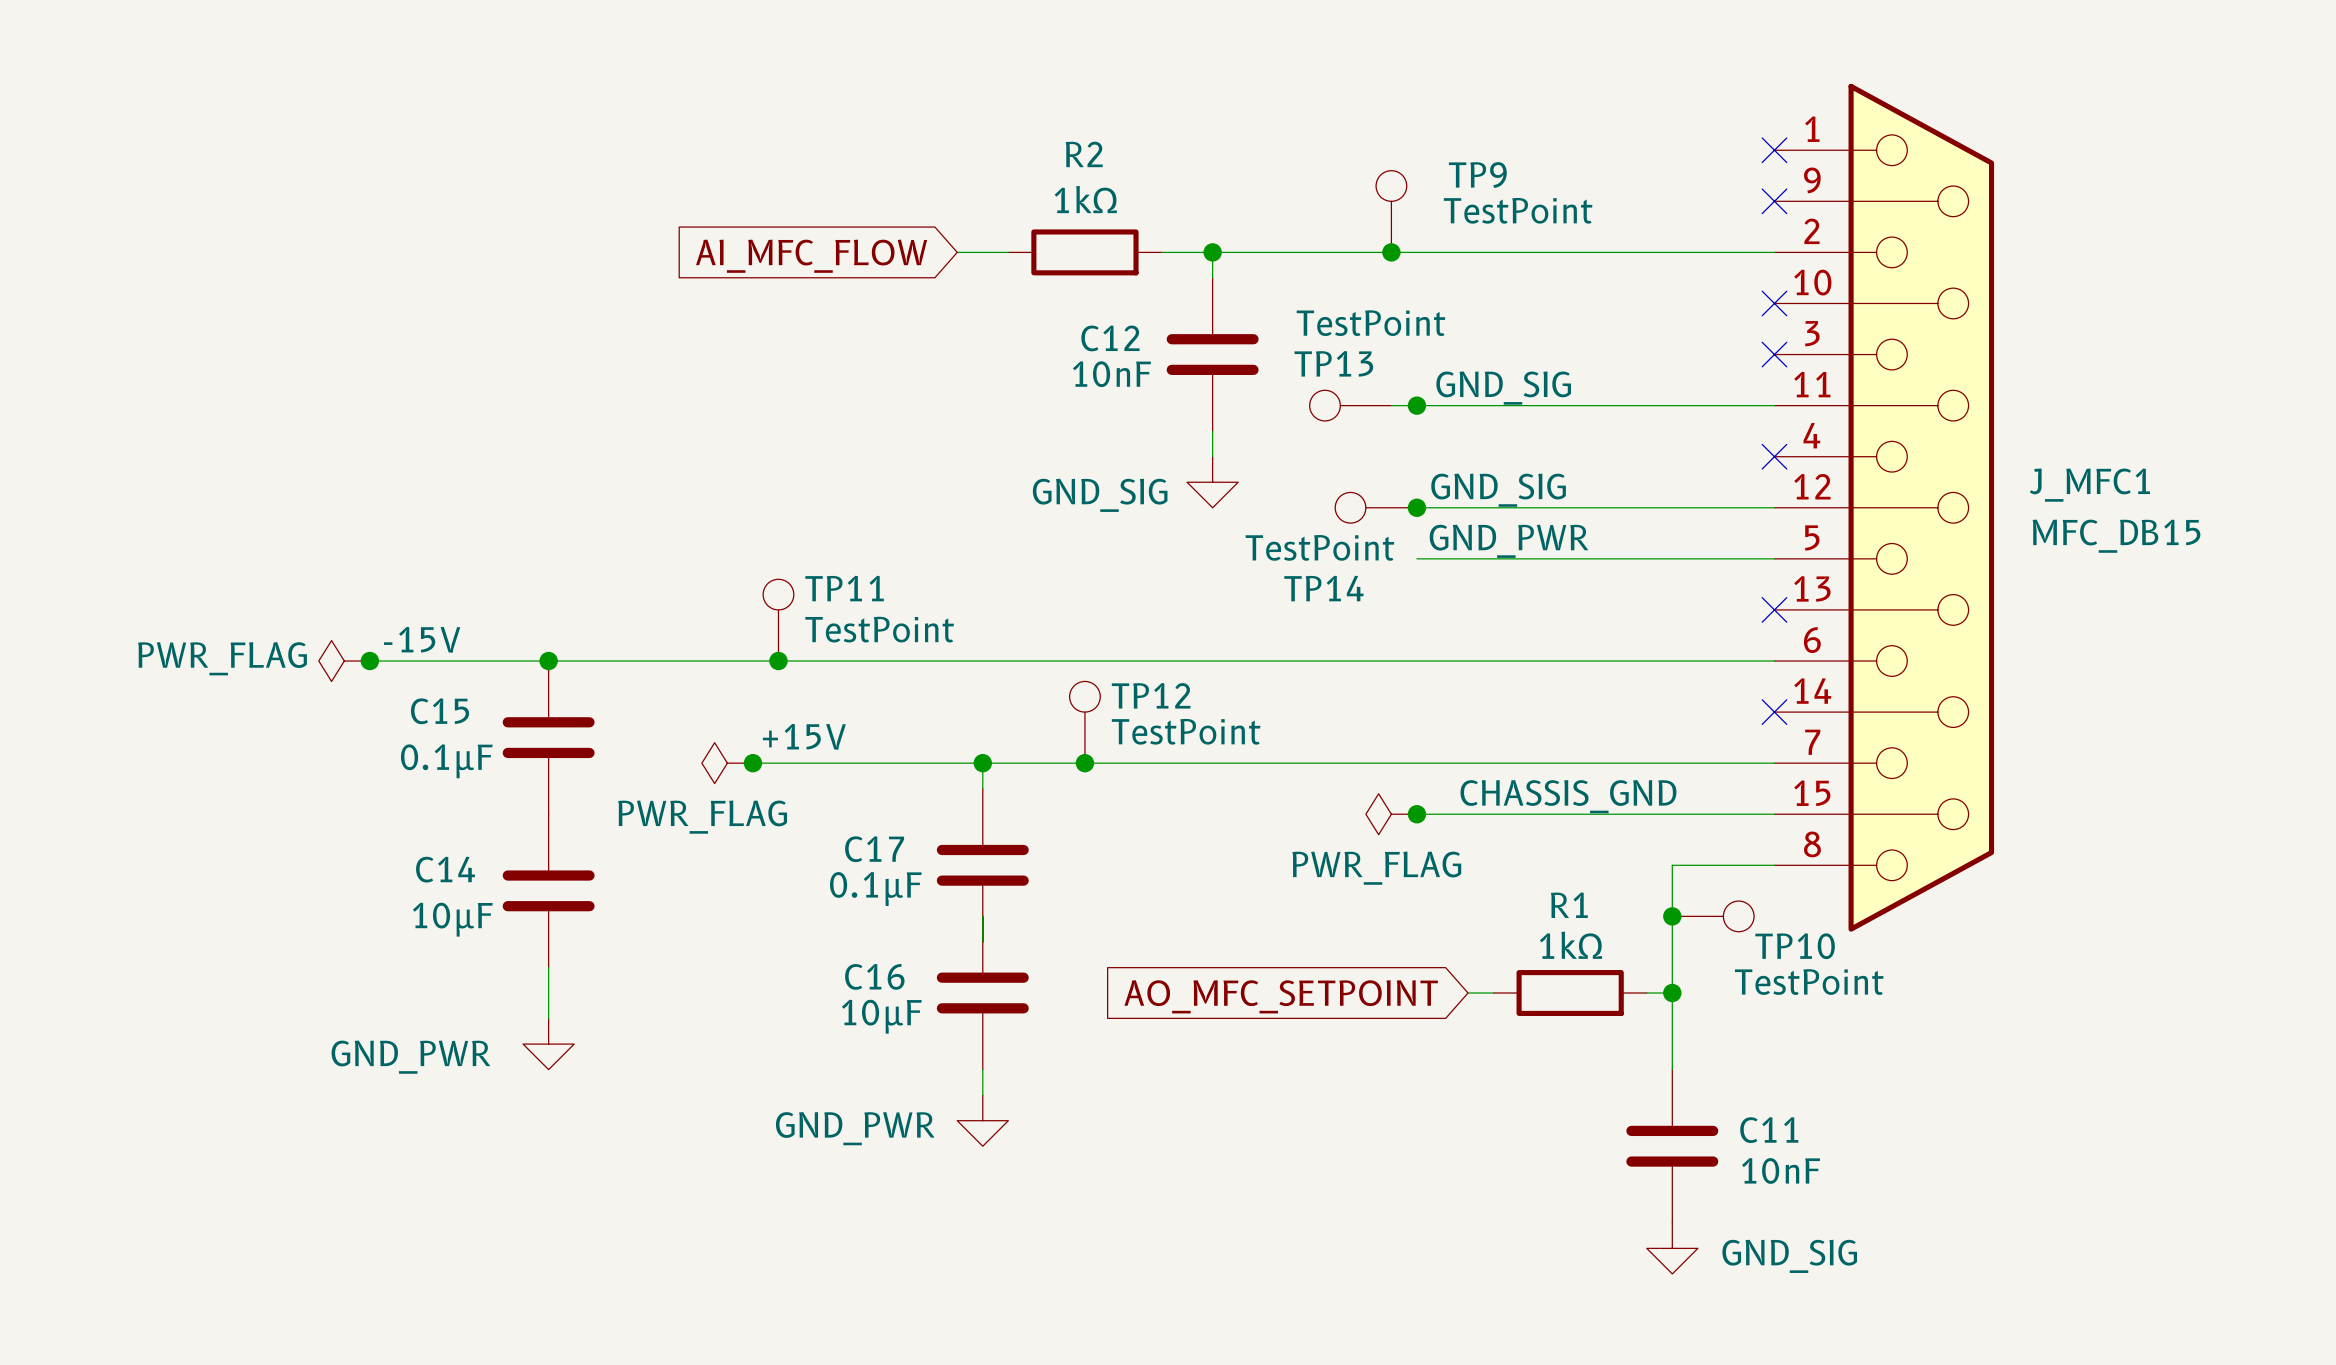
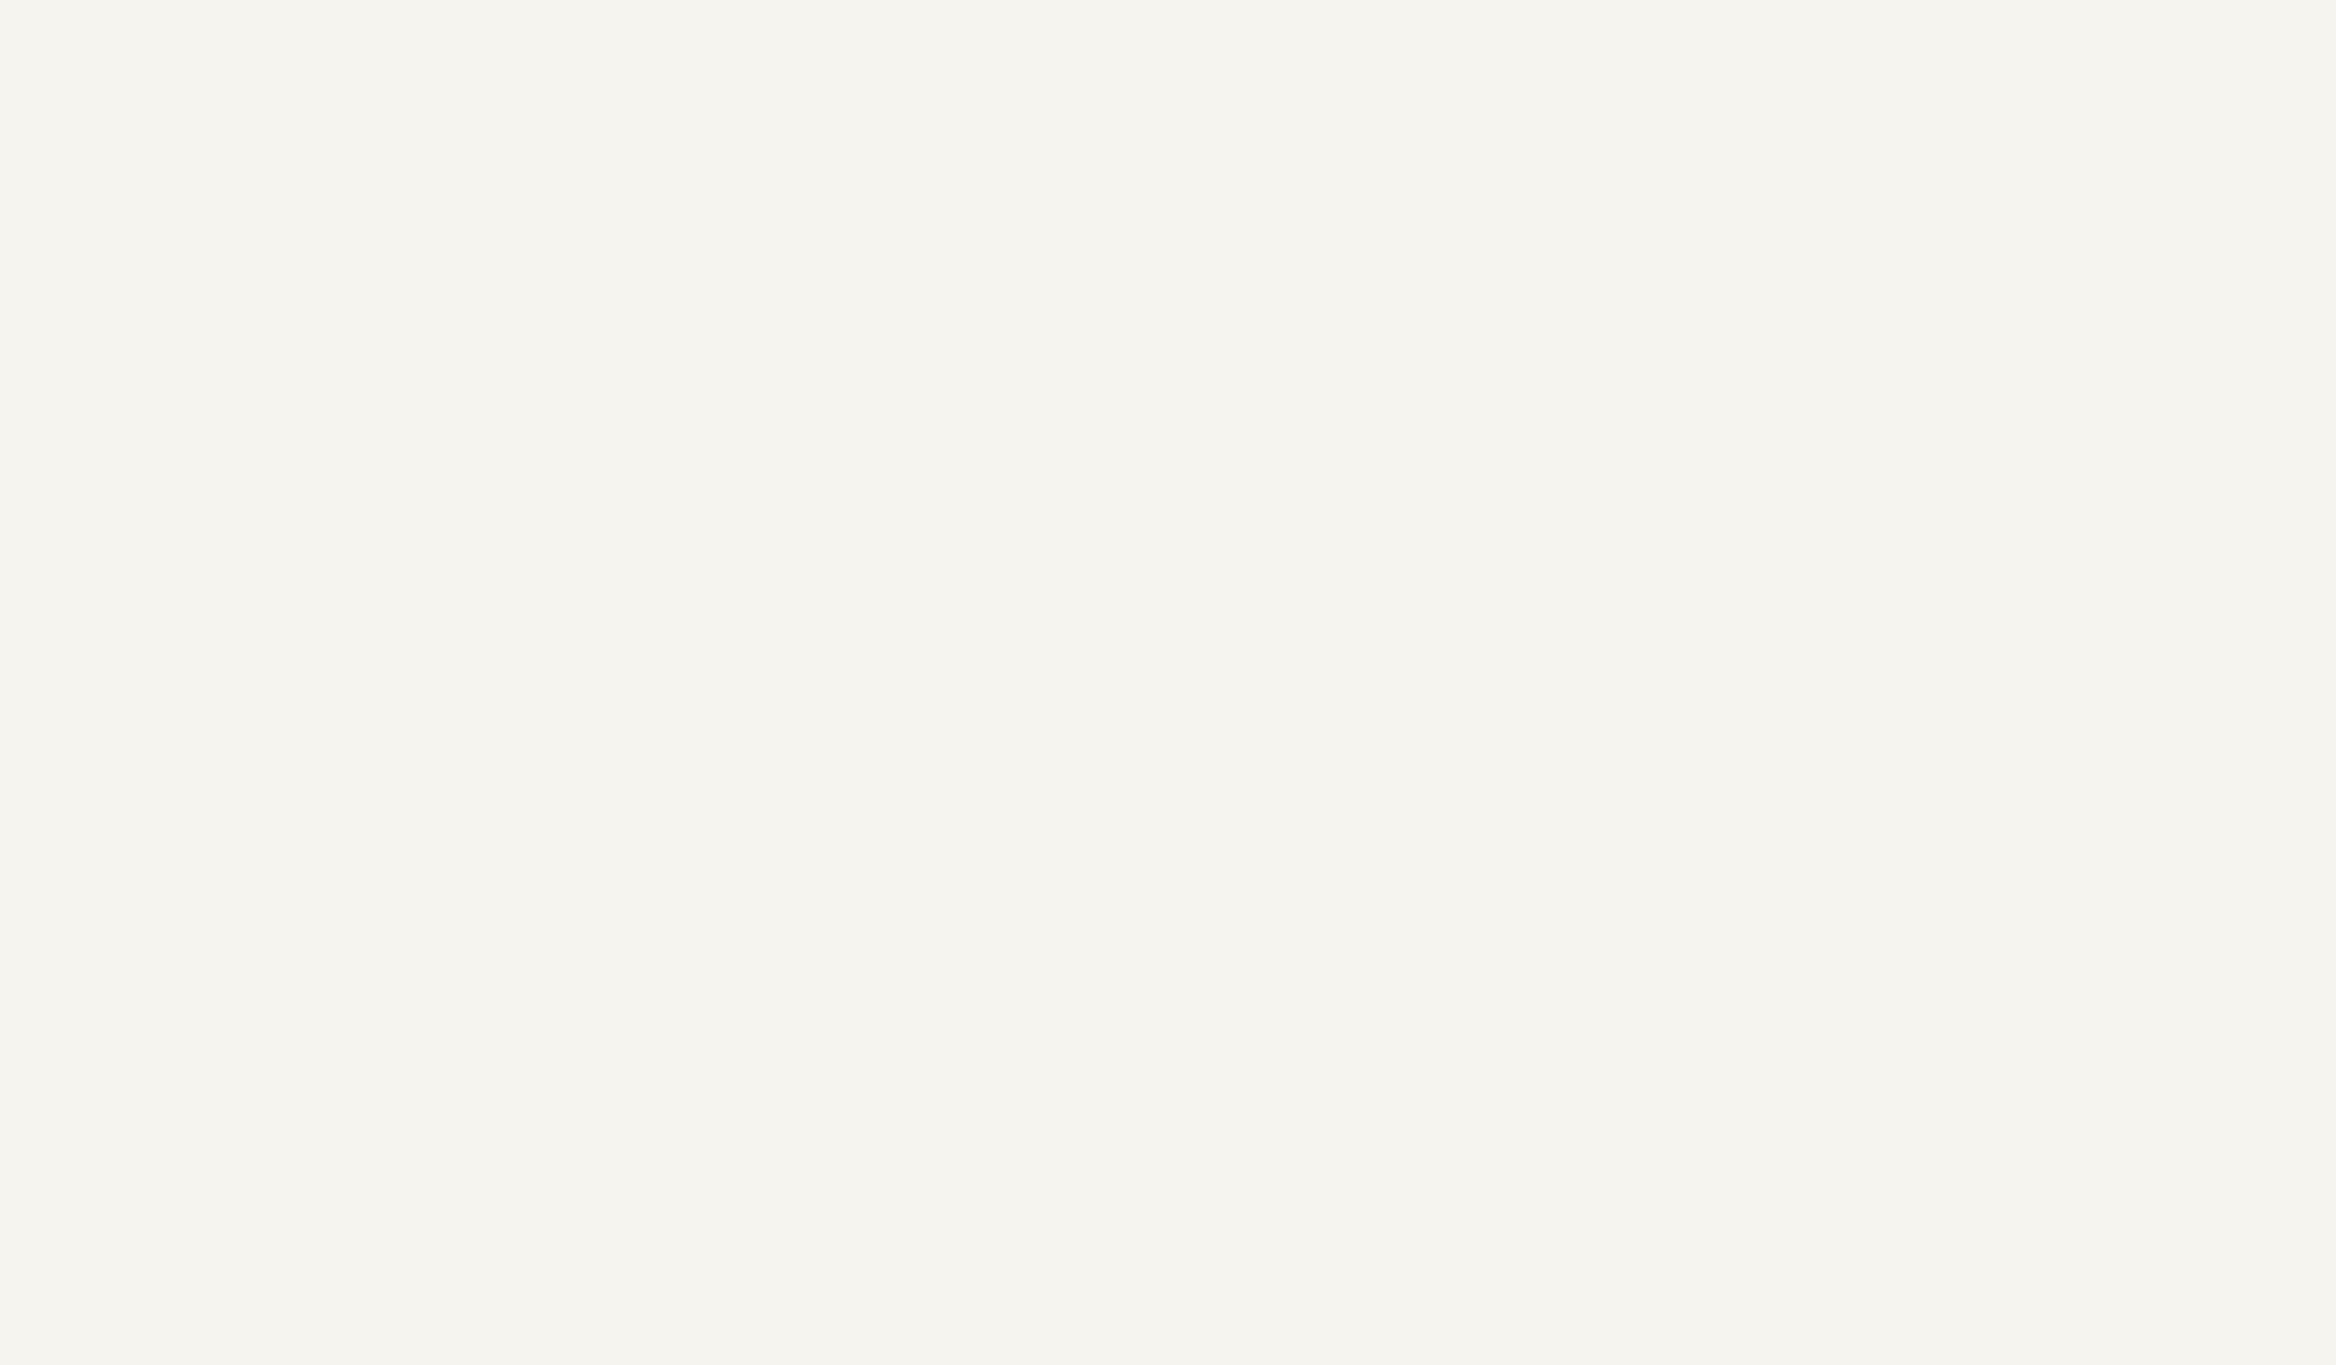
no-connect mark: (1774, 150) -> none
no-connect mark: (1774, 201) -> none
TP9: TestPoint (1391, 211) -> none
wire: (957, 252) (1008, 252) -> none
R2: 1kΩ (1084, 252) -> none
wire: (1161, 252) (1774, 252) -> none
wire: (1212, 252) (1212, 277) -> none
junction: (1212, 252) -> none
junction: (1391, 252) -> none
global label: AI_MFC_FLOW (811, 256) -> none
no-connect mark: (1774, 303) -> none
C12: 10nF (1212, 354) -> none
no-connect mark: (1774, 354) -> none
power symbol: GND_SIG (1503, 388) -> none
TP13: TestPoint (1350, 405) -> none
wire: (1391, 405) (1774, 405) -> none
junction: (1416, 405) -> none
wire: (1212, 431) (1212, 456) -> none
no-connect mark: (1774, 456) -> none
power symbol: GND_SIG (1212, 482) -> none
power symbol: GND_SIG (1498, 490) -> none
TP14: TestPoint (1376, 507) -> none
wire: (1416, 507) (1774, 507) -> none
junction: (1416, 507) -> none
J_MFC1: MFC_DB15 (1884, 507) -> none
power symbol: GND_PWR (1509, 541) -> none
wire: (1416, 558) (1774, 558) -> none
no-connect mark: (1774, 609) -> none
TP11: TestPoint (778, 620) -> none
power symbol: -15V (422, 639) -> none
power symbol: PWR_FLAG (344, 661) -> none
wire: (369, 661) (1774, 661) -> none
junction: (369, 661) -> none
junction: (548, 661) -> none
junction: (778, 661) -> none
no-connect mark: (1774, 712) -> none
TP12: TestPoint (1084, 722) -> none
power symbol: +15V (804, 736) -> none
C15: 0.1µF (548, 737) -> none
power symbol: PWR_FLAG (727, 763) -> none
wire: (752, 763) (1774, 763) -> none
junction: (752, 763) -> none
wire: (982, 763) (982, 788) -> none
junction: (982, 763) -> none
junction: (1084, 763) -> none
power symbol: CHASSIS_GND (1568, 796) -> none
power symbol: PWR_FLAG (1391, 814) -> none
wire: (1416, 814) (1774, 814) -> none
junction: (1416, 814) -> none
C17: 0.1µF (982, 865) -> none
wire: (1774, 865) (1672, 865) (1672, 1069) -> none
C14: 10µF (548, 890) -> none
wire: (982, 916) (982, 941) -> none
junction: (1672, 916) -> none
TP10: TestPoint (1713, 916) -> none
wire: (548, 967) (548, 1018) -> none
C16: 10µF (982, 993) -> none
wire: (1468, 993) (1493, 993) -> none
R1: 1kΩ (1570, 993) -> none
wire: (1646, 993) (1672, 993) -> none
junction: (1672, 993) -> none
global label: AO_MFC_SETPOINT (1281, 996) -> none
power symbol: GND_PWR (548, 1044) -> none
wire: (982, 1069) (982, 1095) -> none
power symbol: GND_PWR (982, 1120) -> none
C11: 10nF (1672, 1146) -> none
power symbol: GND_SIG (1672, 1248) -> none

